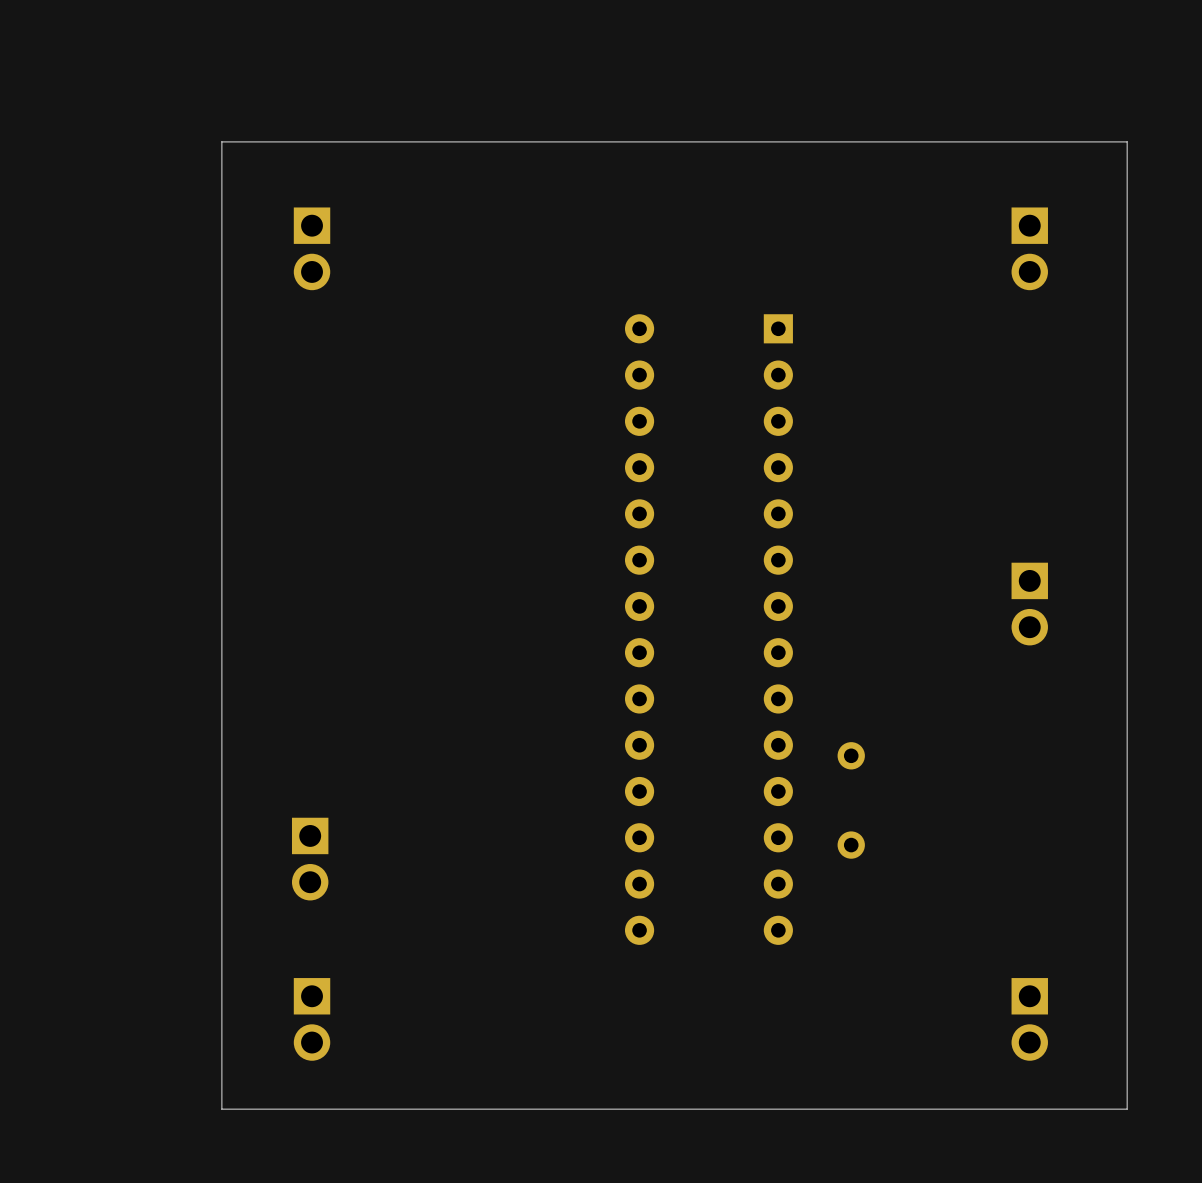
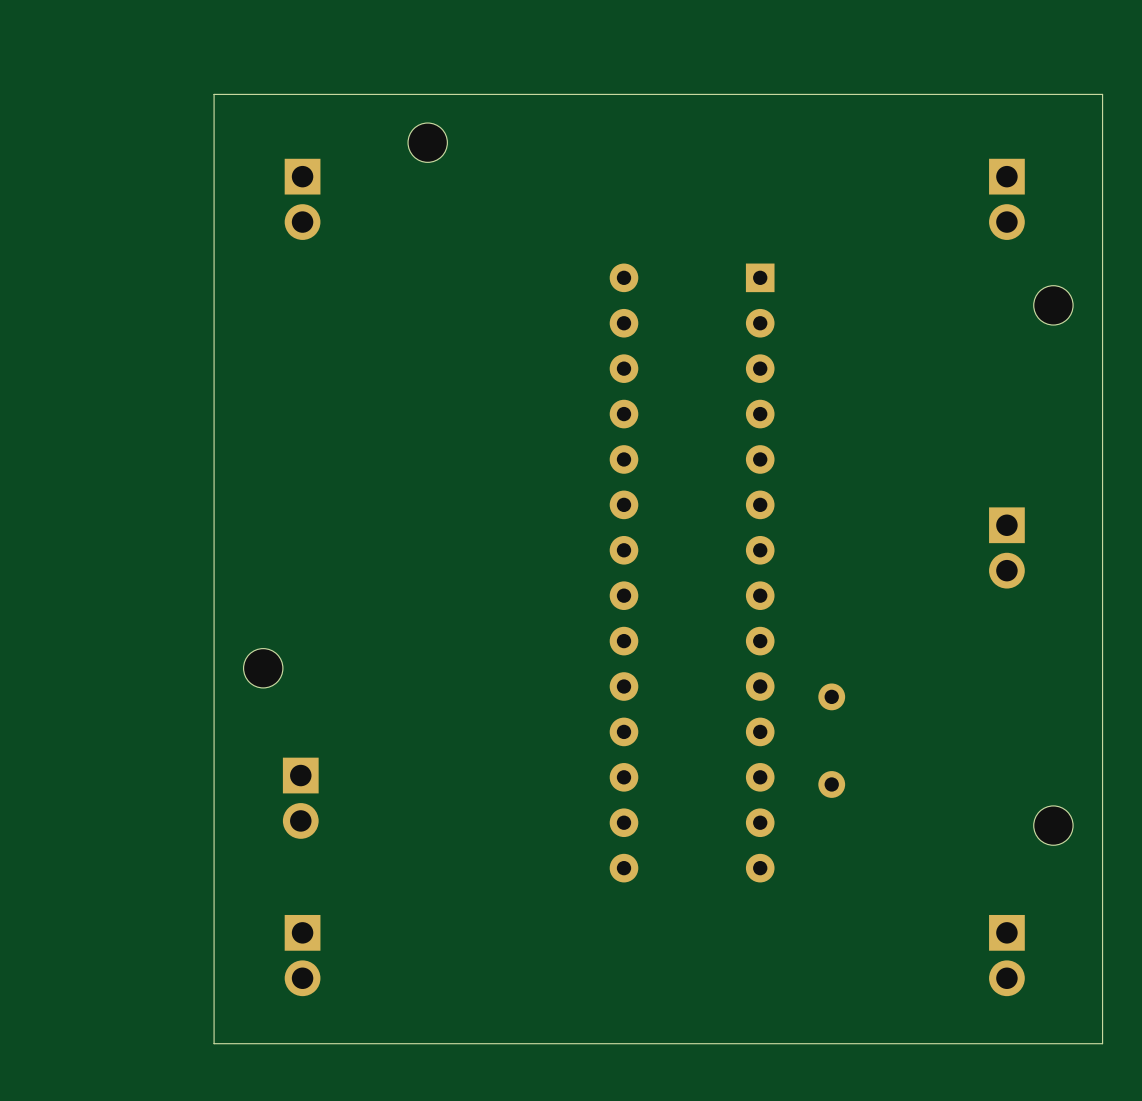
part: none -> (427, 142)
part: none -> (1053, 305)
part: none -> (263, 668)
part: none -> (1053, 825)

